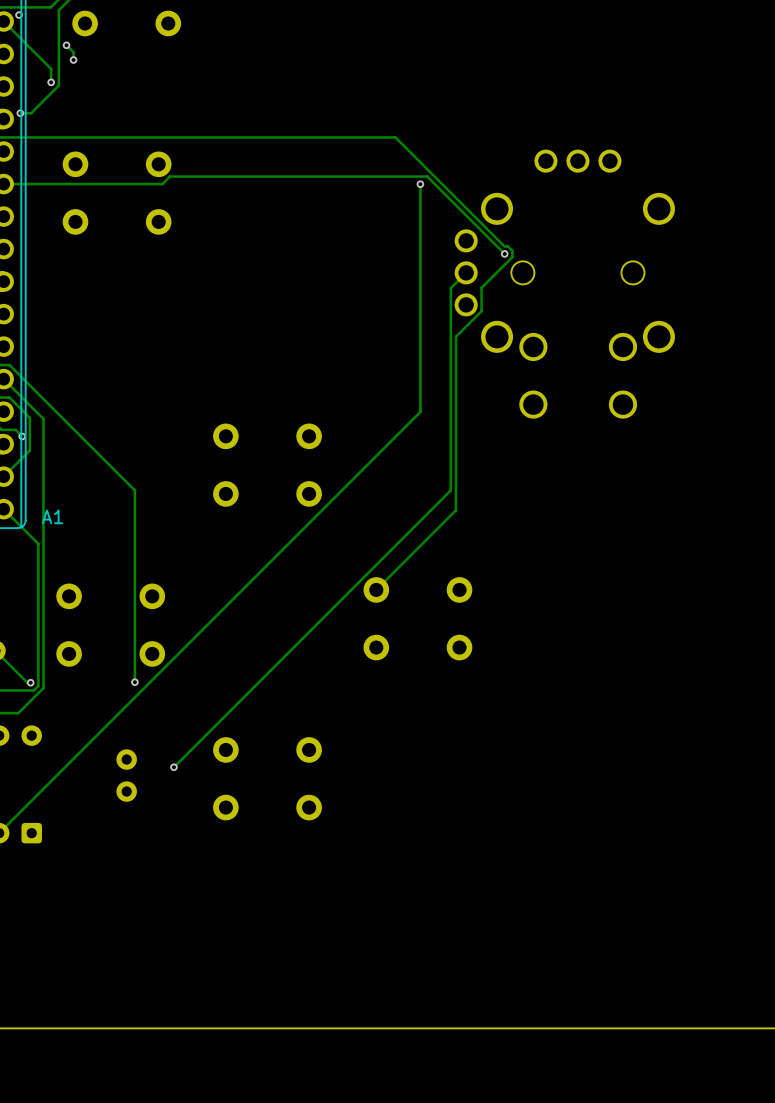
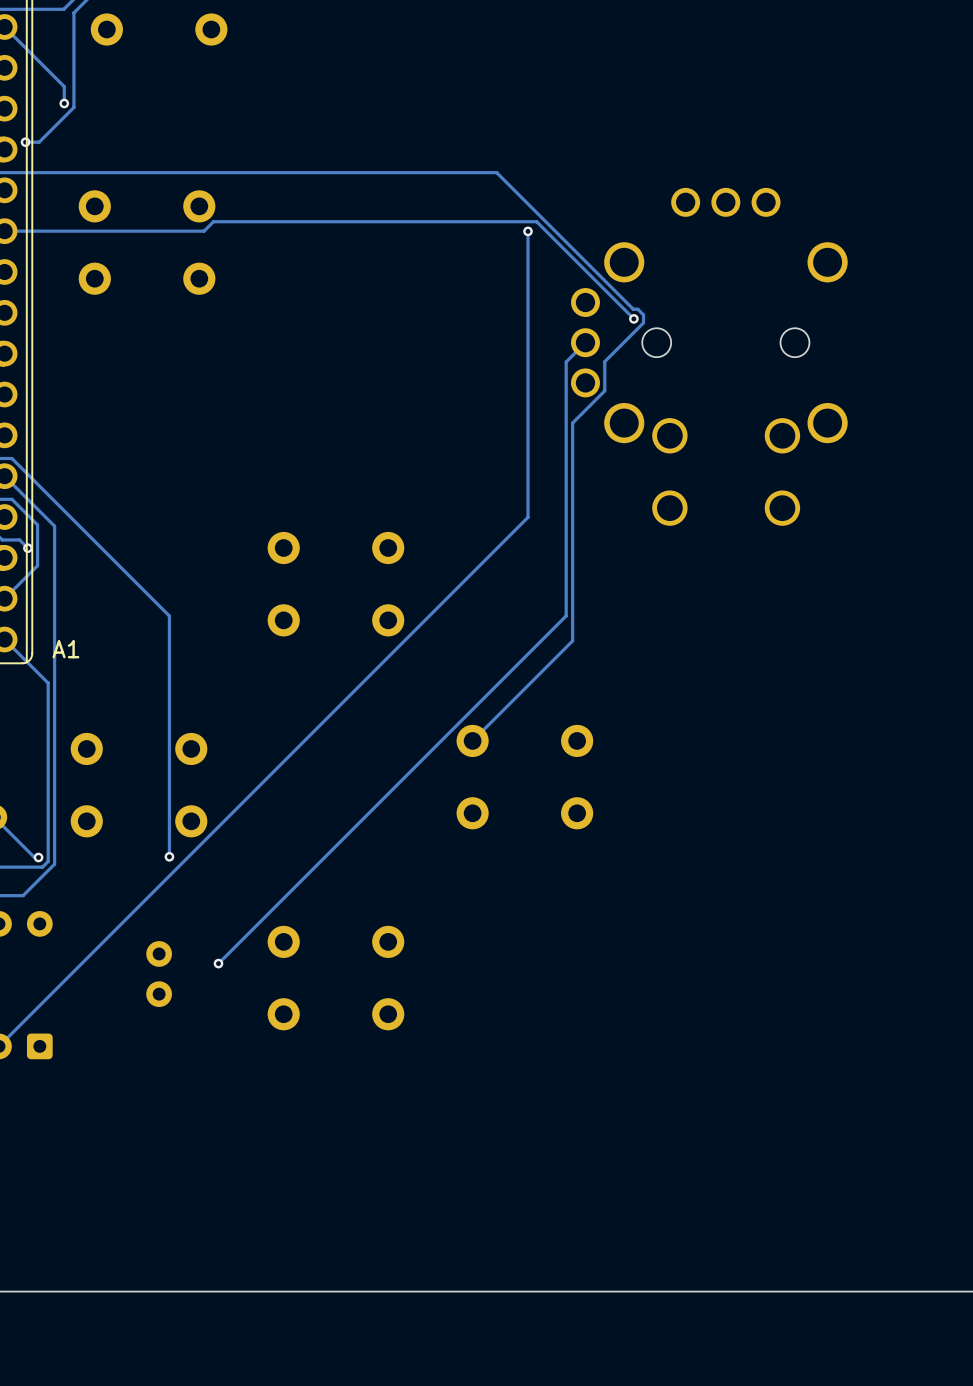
via: (19, 15) -> none
track: (66, 45) (73, 52) (73, 59) -> none
via: (66, 45) -> none
via: (73, 59) -> none

